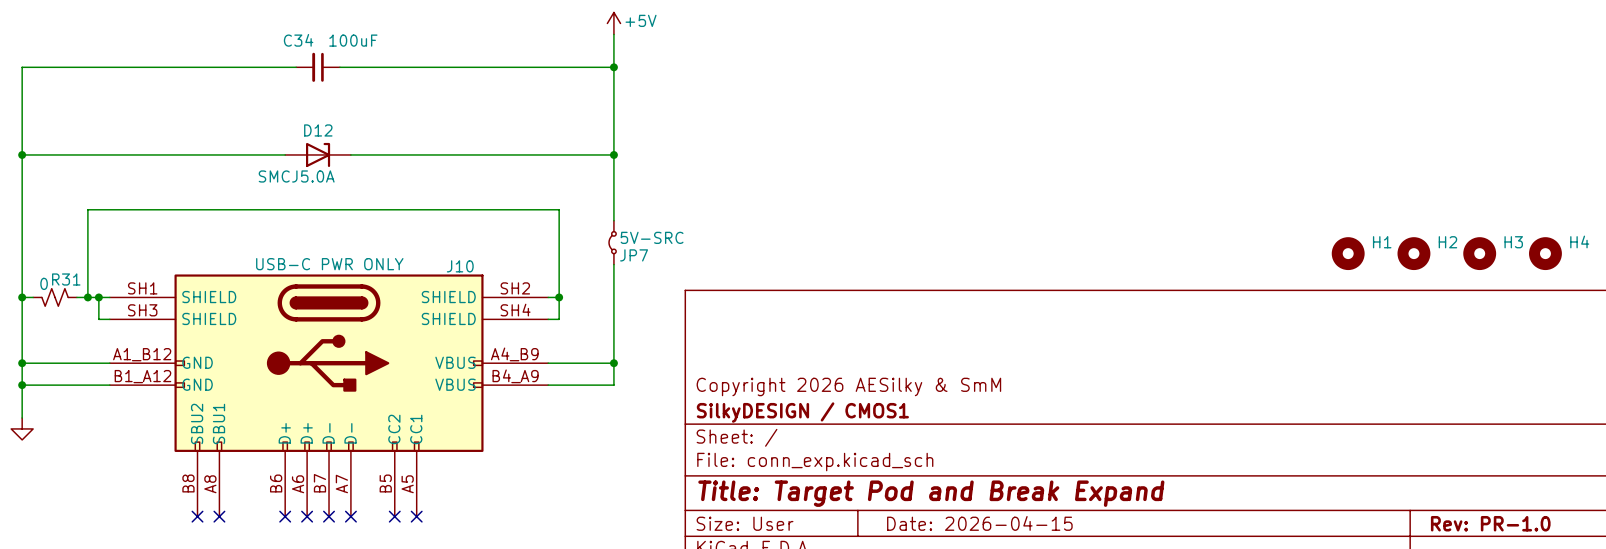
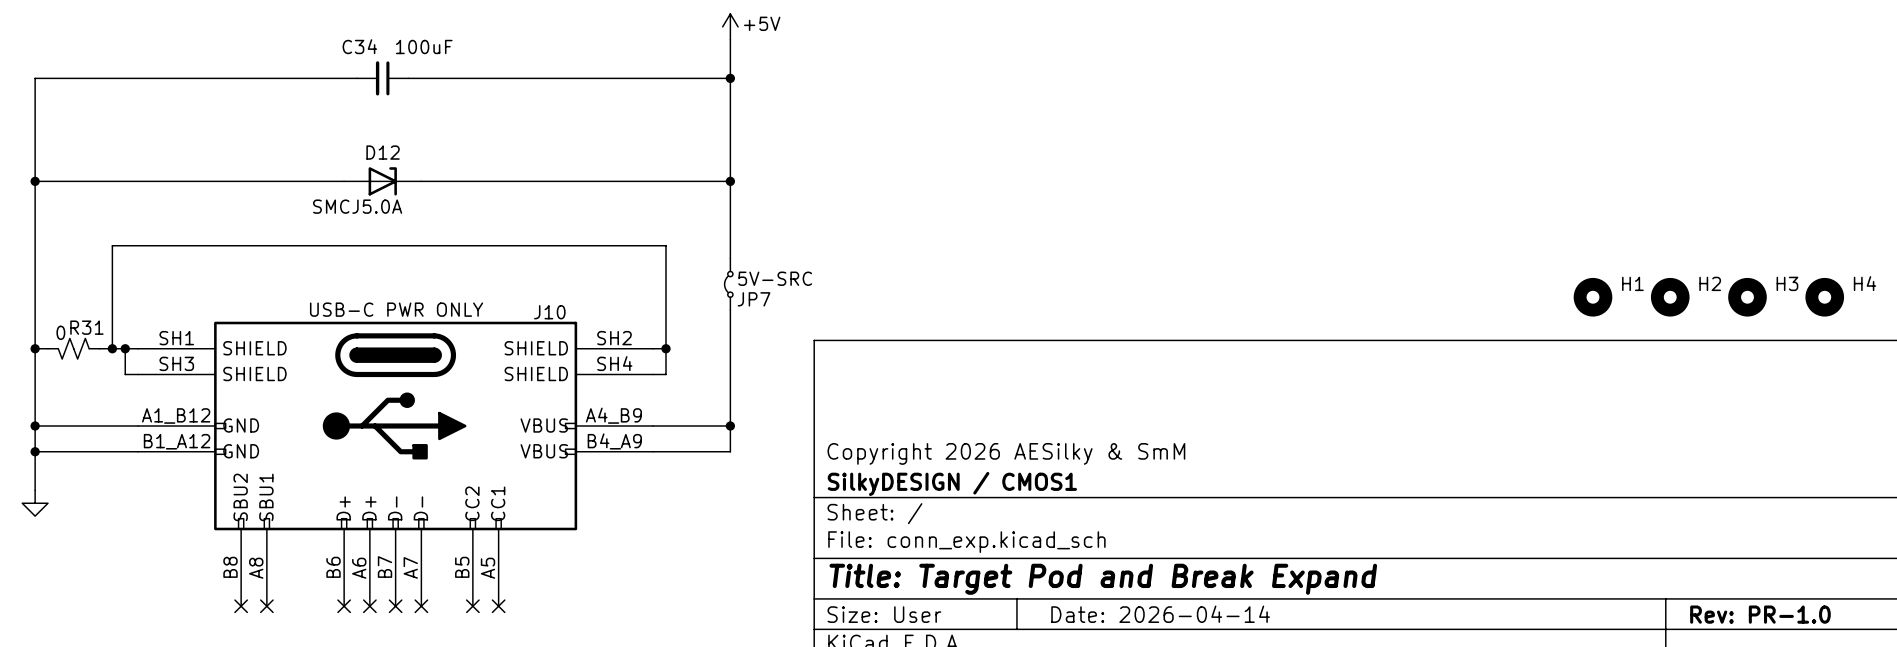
title block: Date: 2026-04-15 (979, 523) -> Date: 2026-04-14 (1160, 614)

